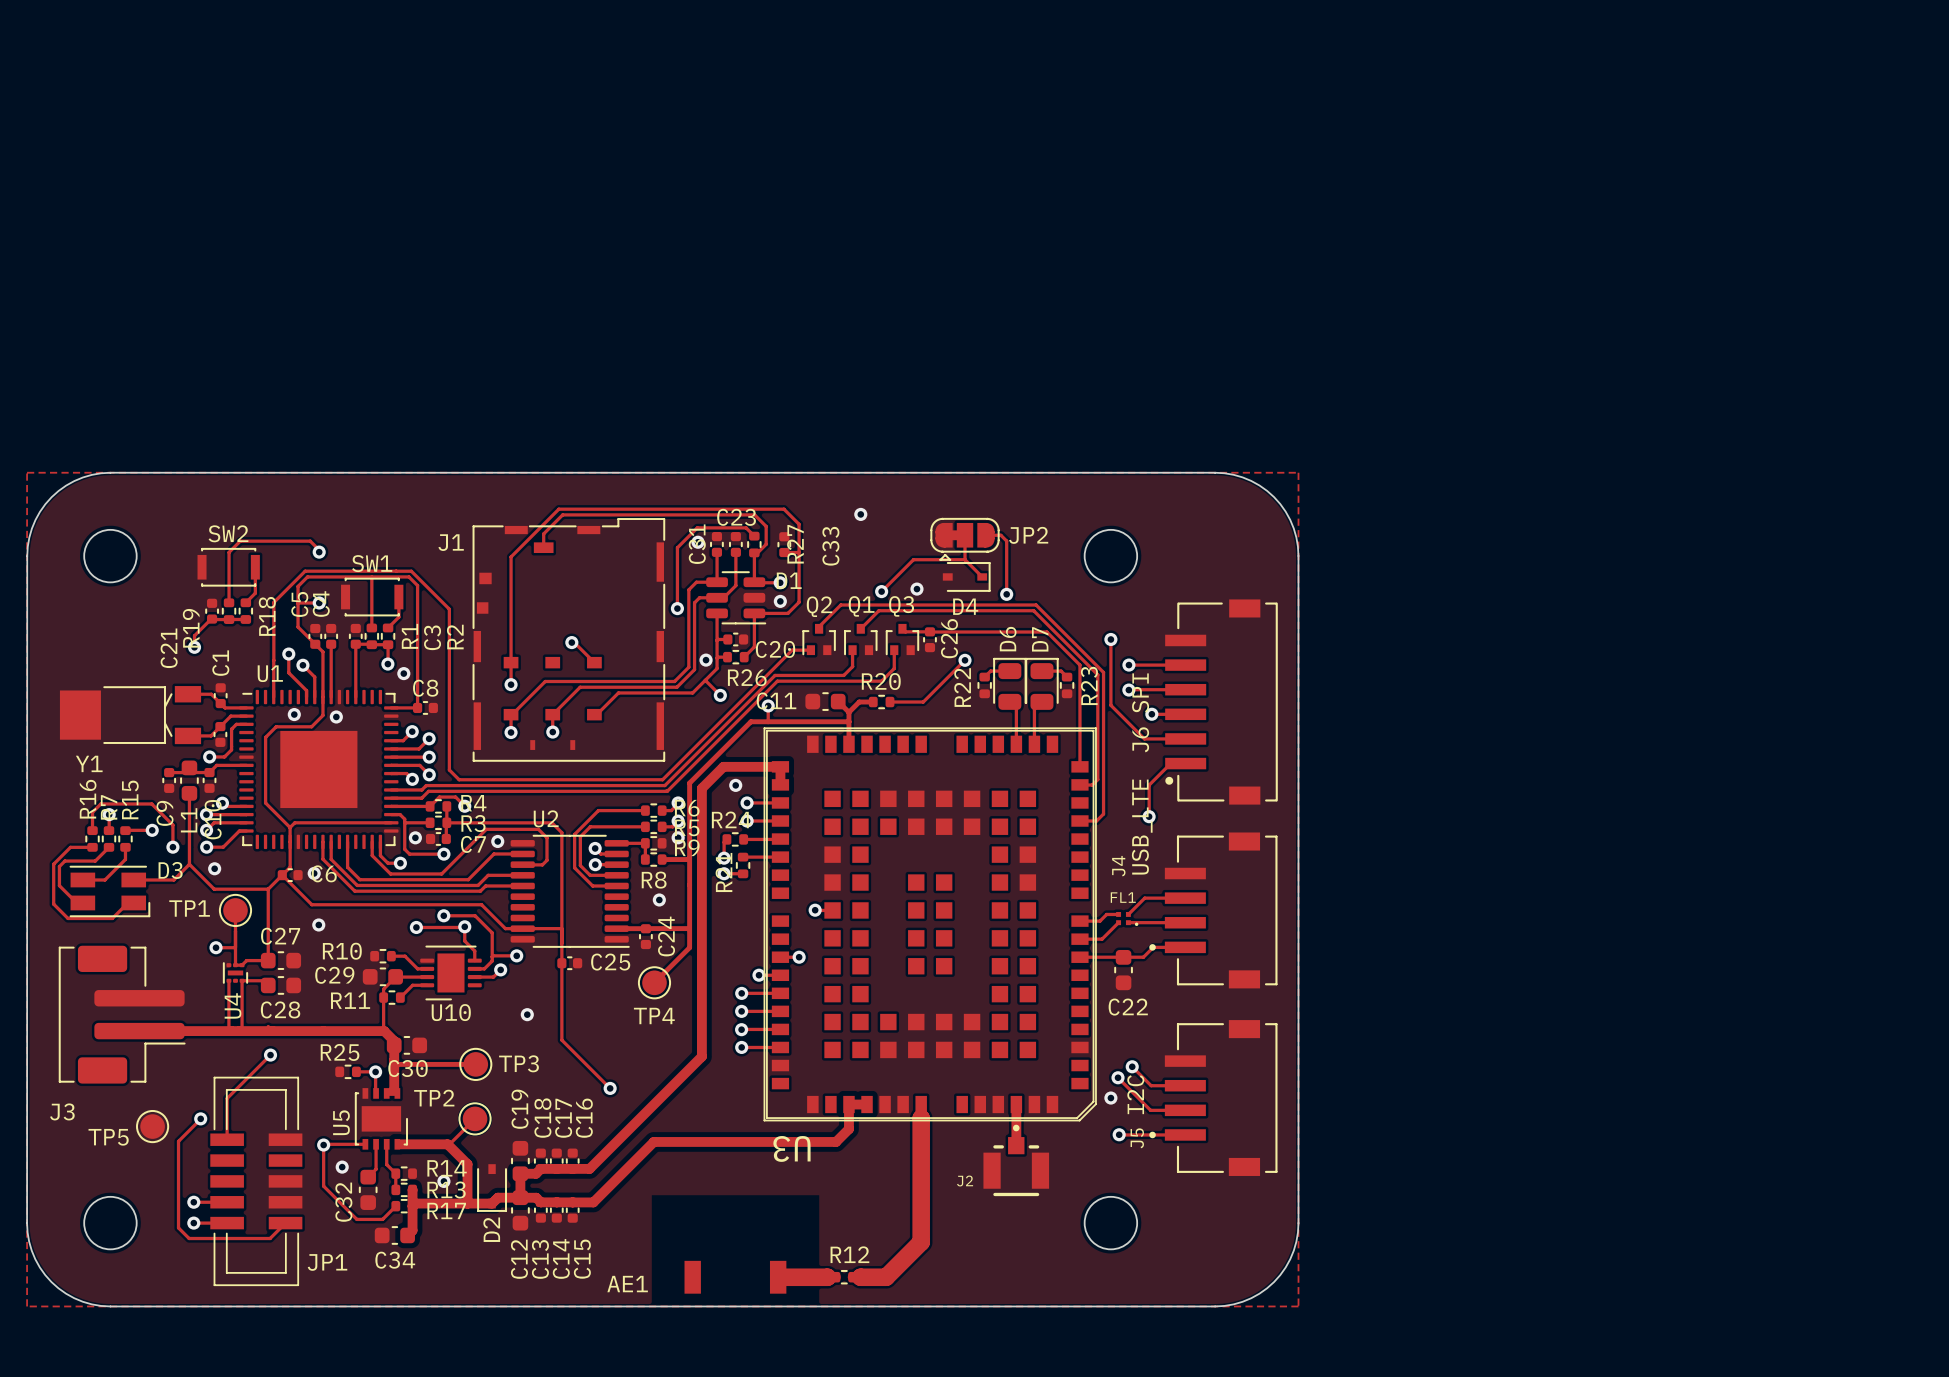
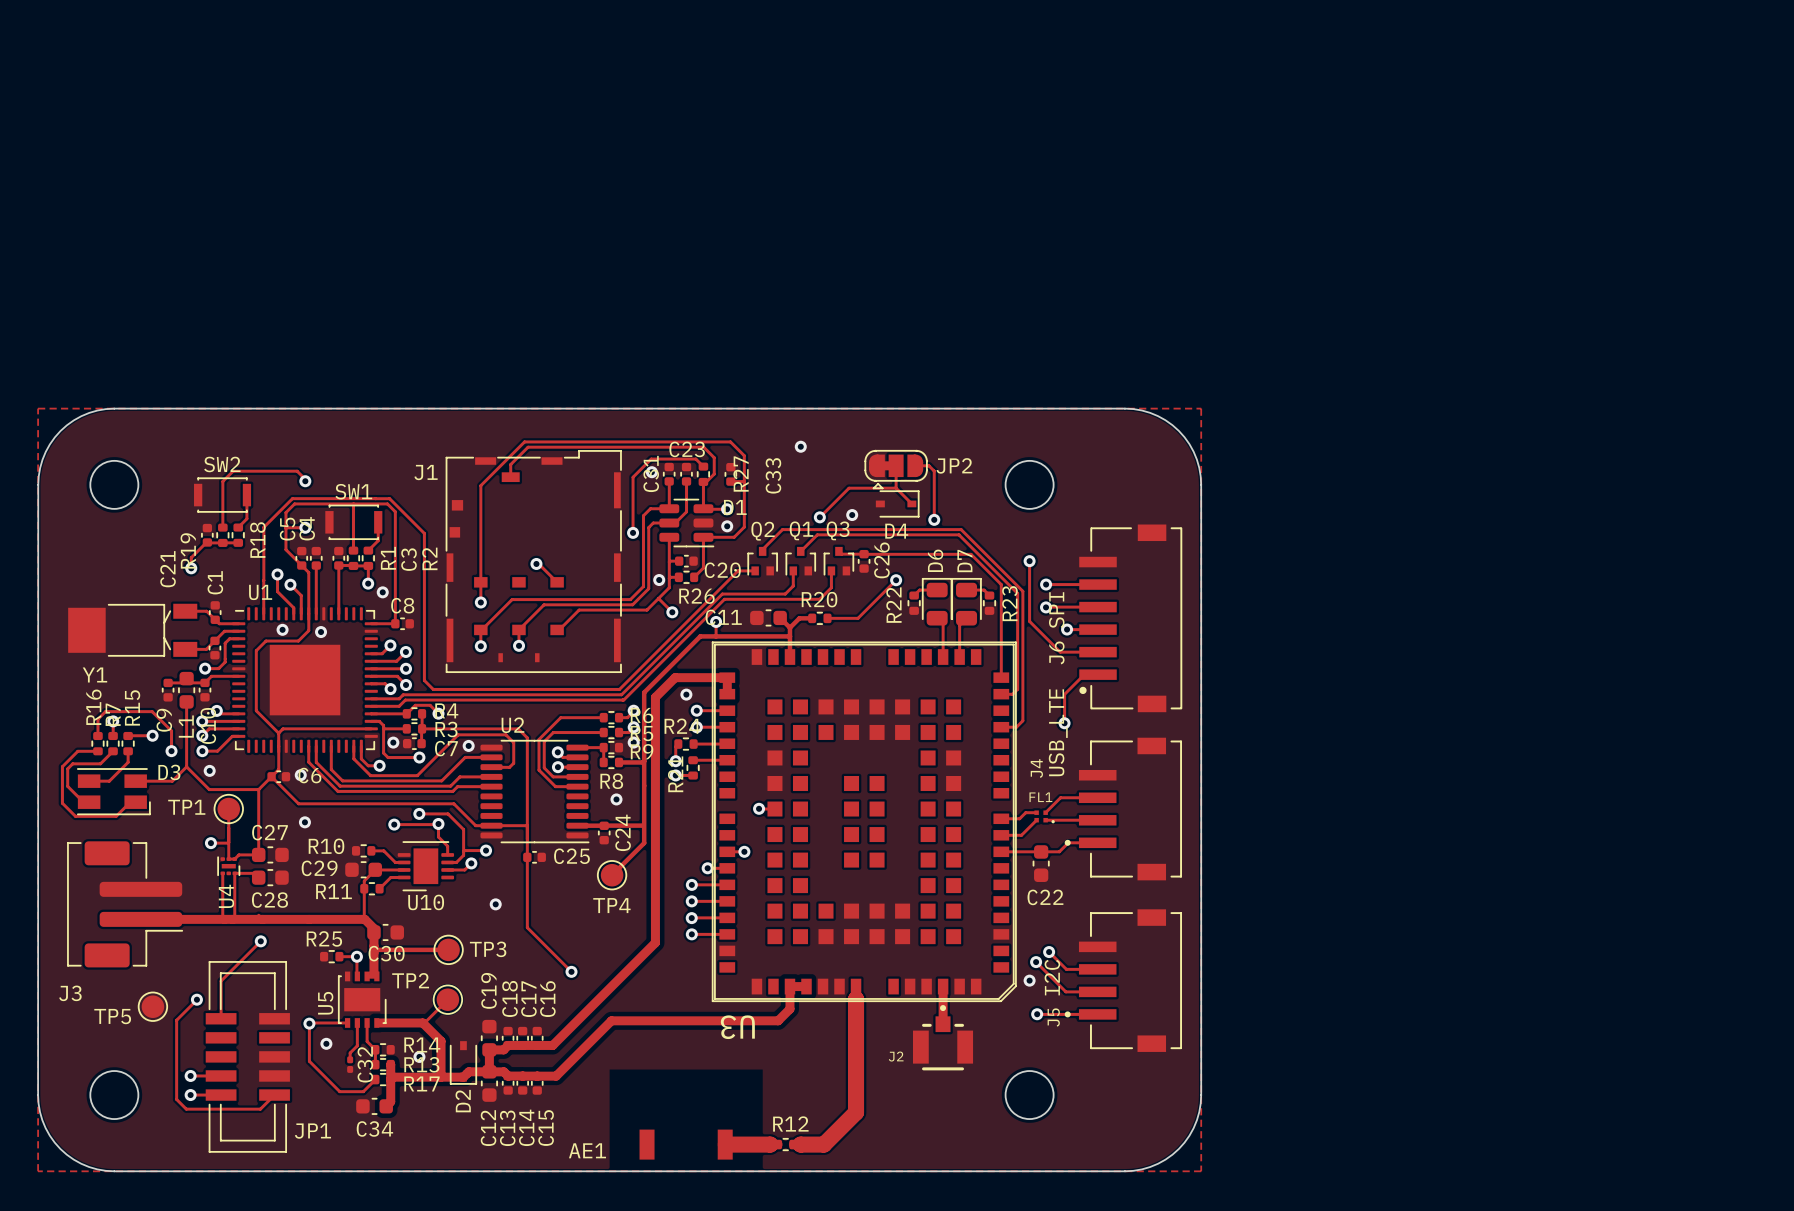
C32 footprint: [358, 1169, 378, 1210] -> [347, 1056, 354, 1073]
track: none -> (350, 1053) (350, 1059)
C32 name position: C32 (343, 1202) -> C32 (365, 1064)

